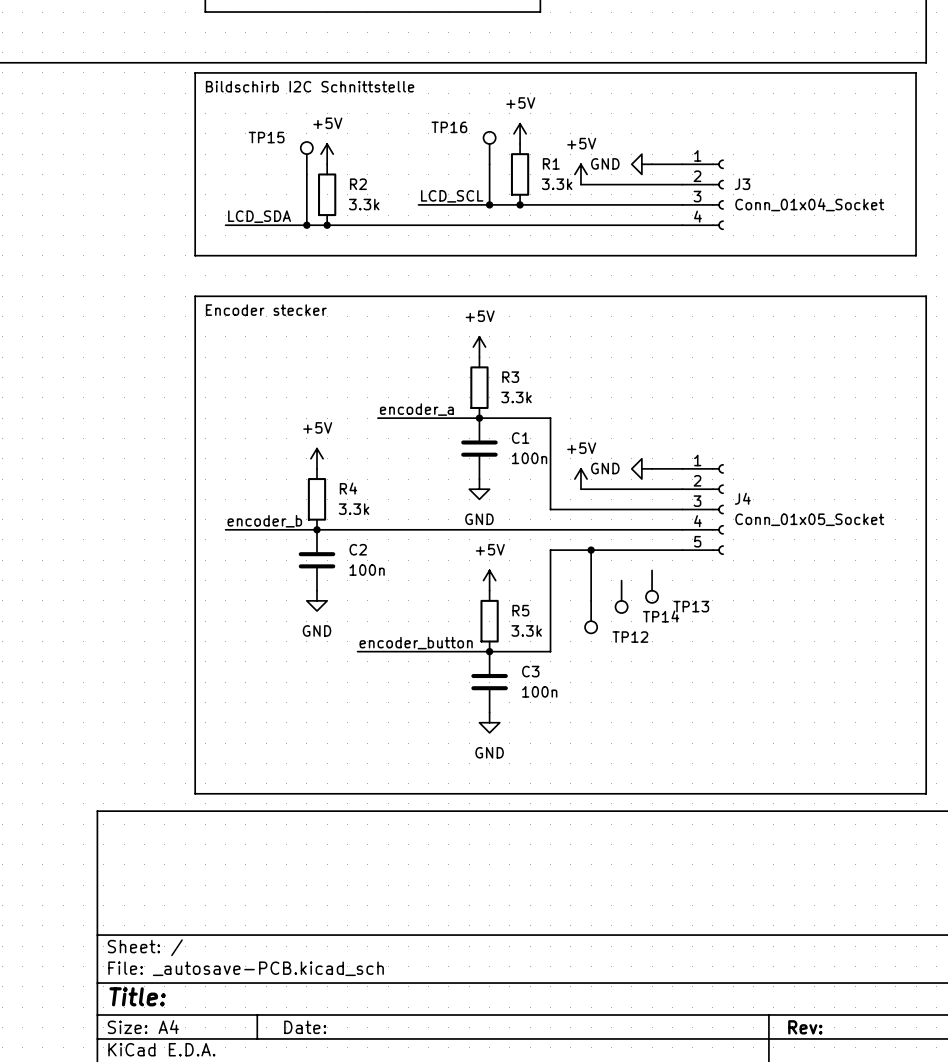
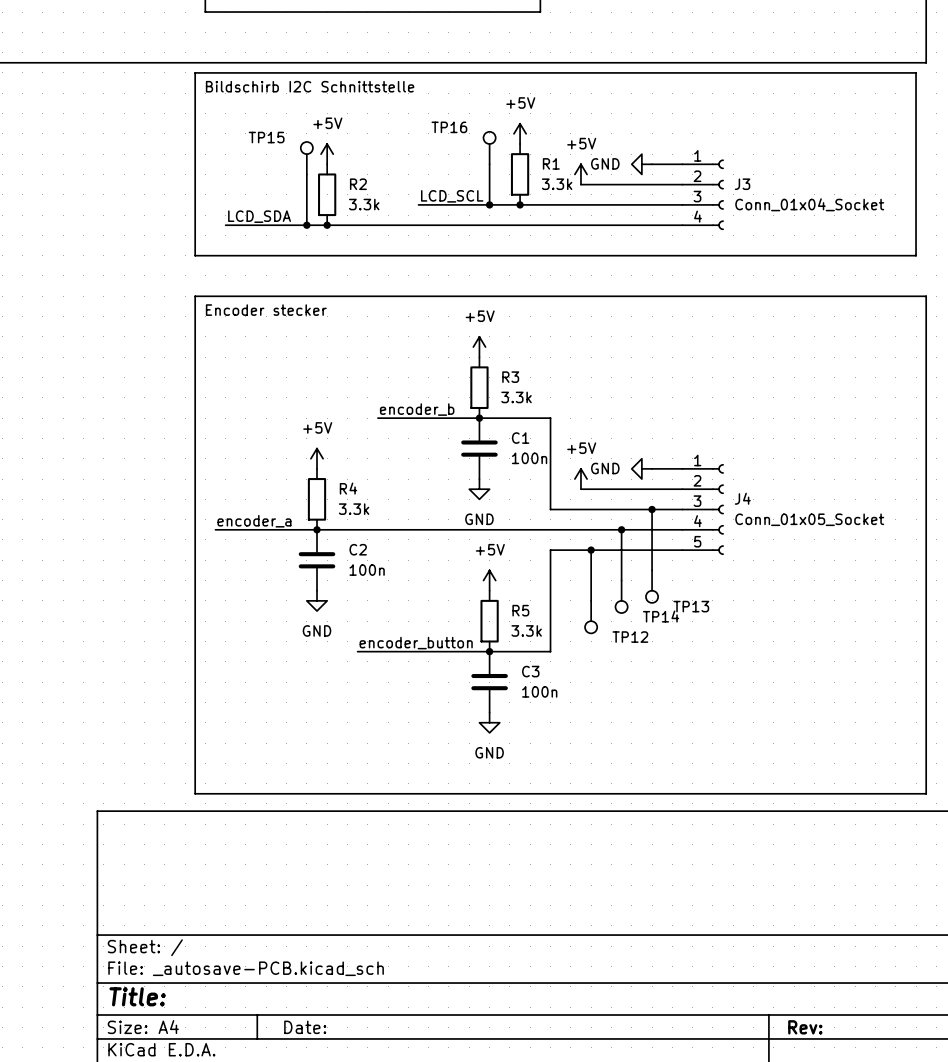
label: encoder_a (416, 409) -> encoder_b (417, 409)
wire: none -> (652, 509) (652, 570)
junction: none -> (652, 509)
label: encoder_b (264, 521) -> encoder_a (254, 521)
wire: none -> (215, 529) (225, 529)
wire: none -> (621, 529) (621, 580)
junction: none -> (621, 529)

